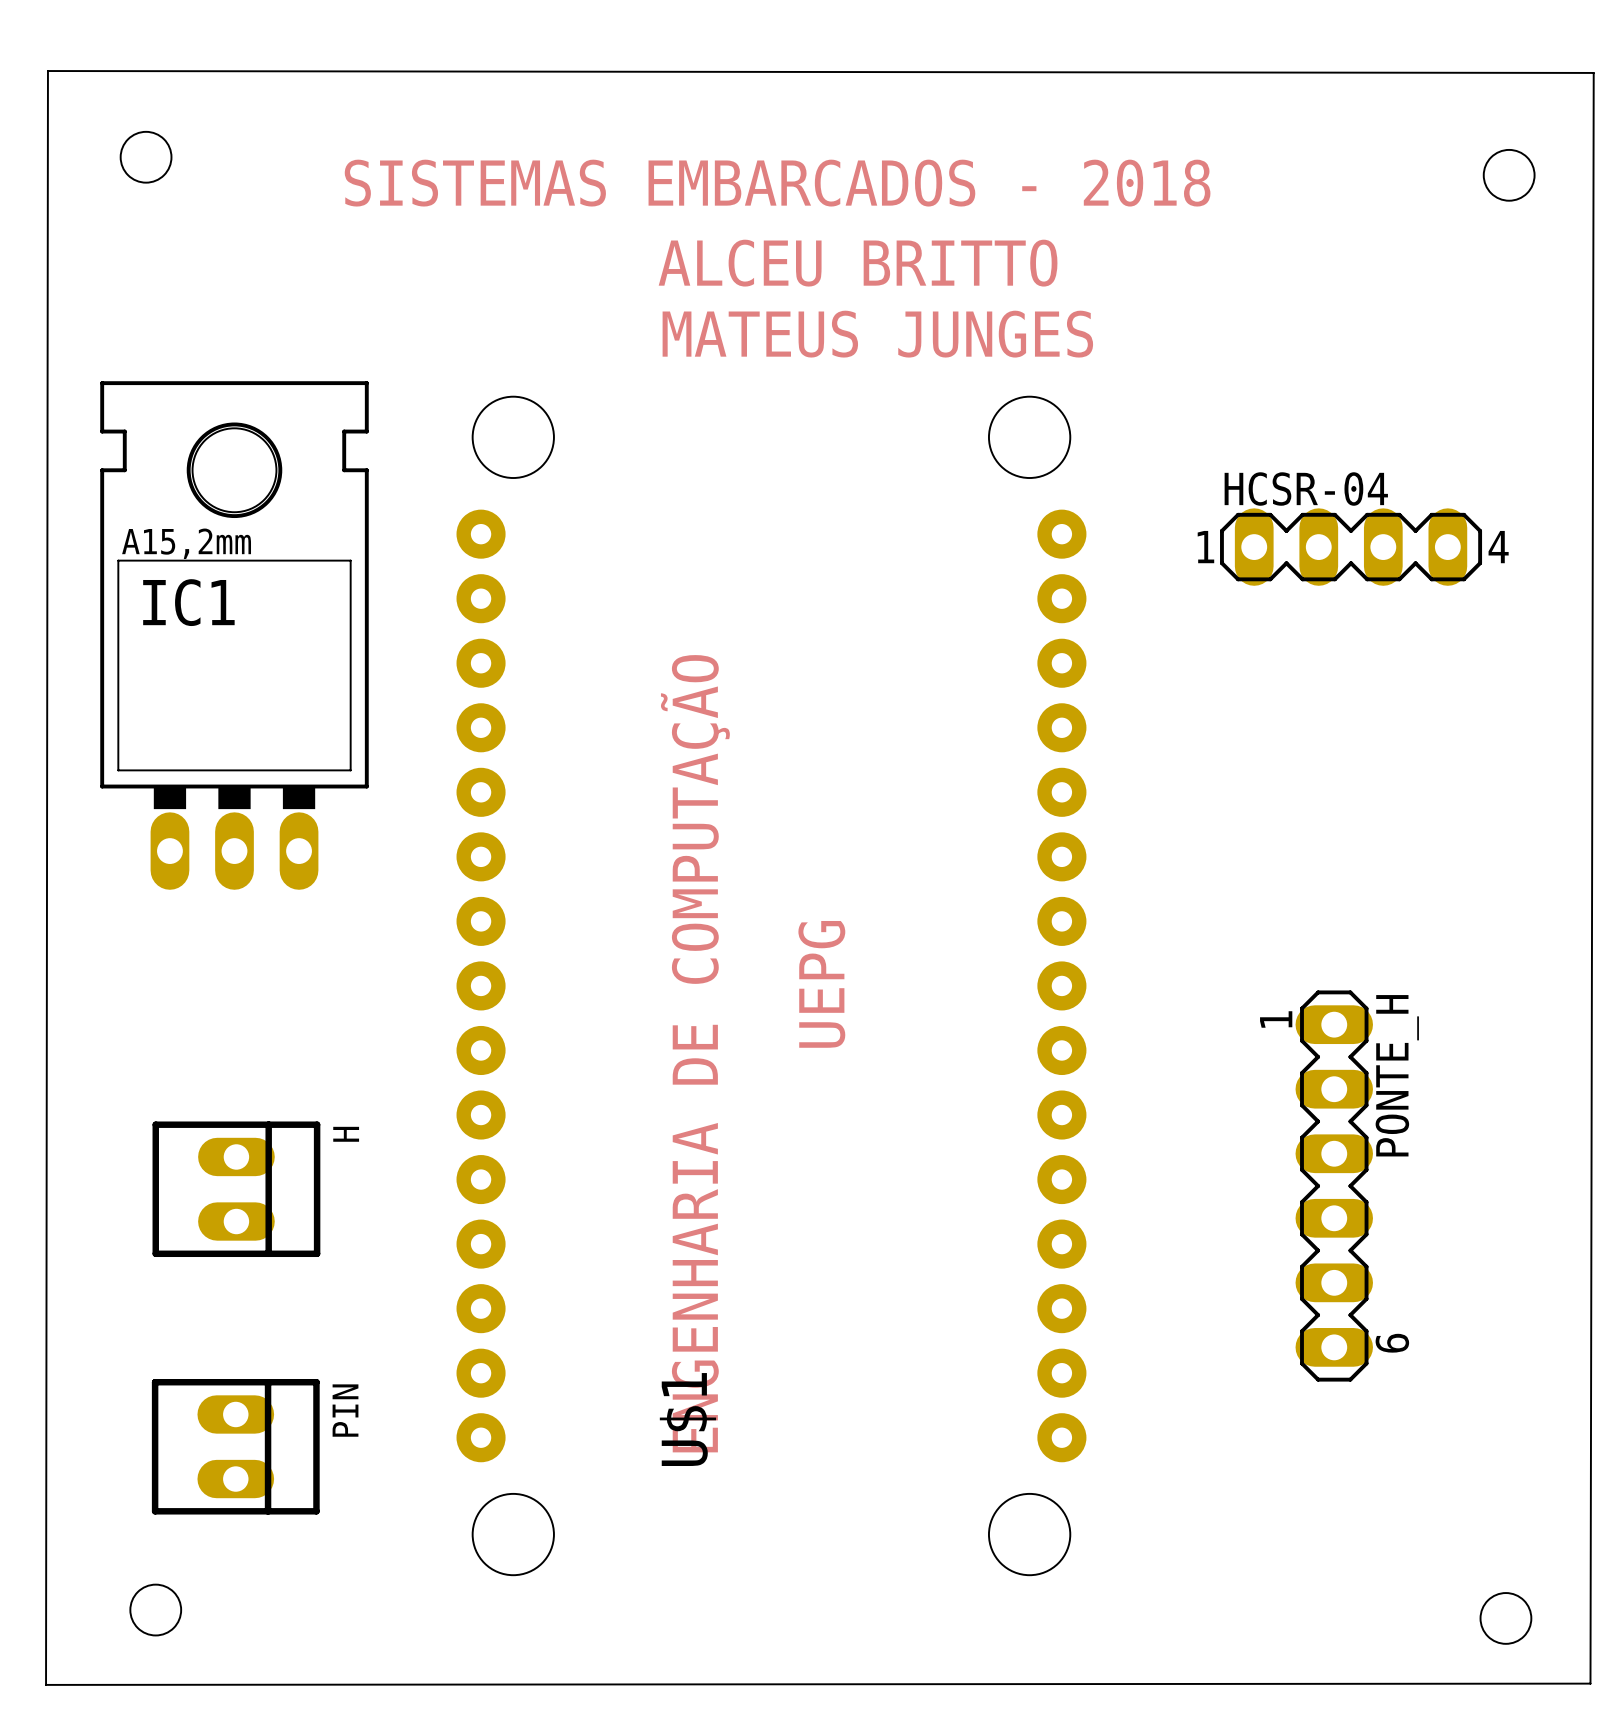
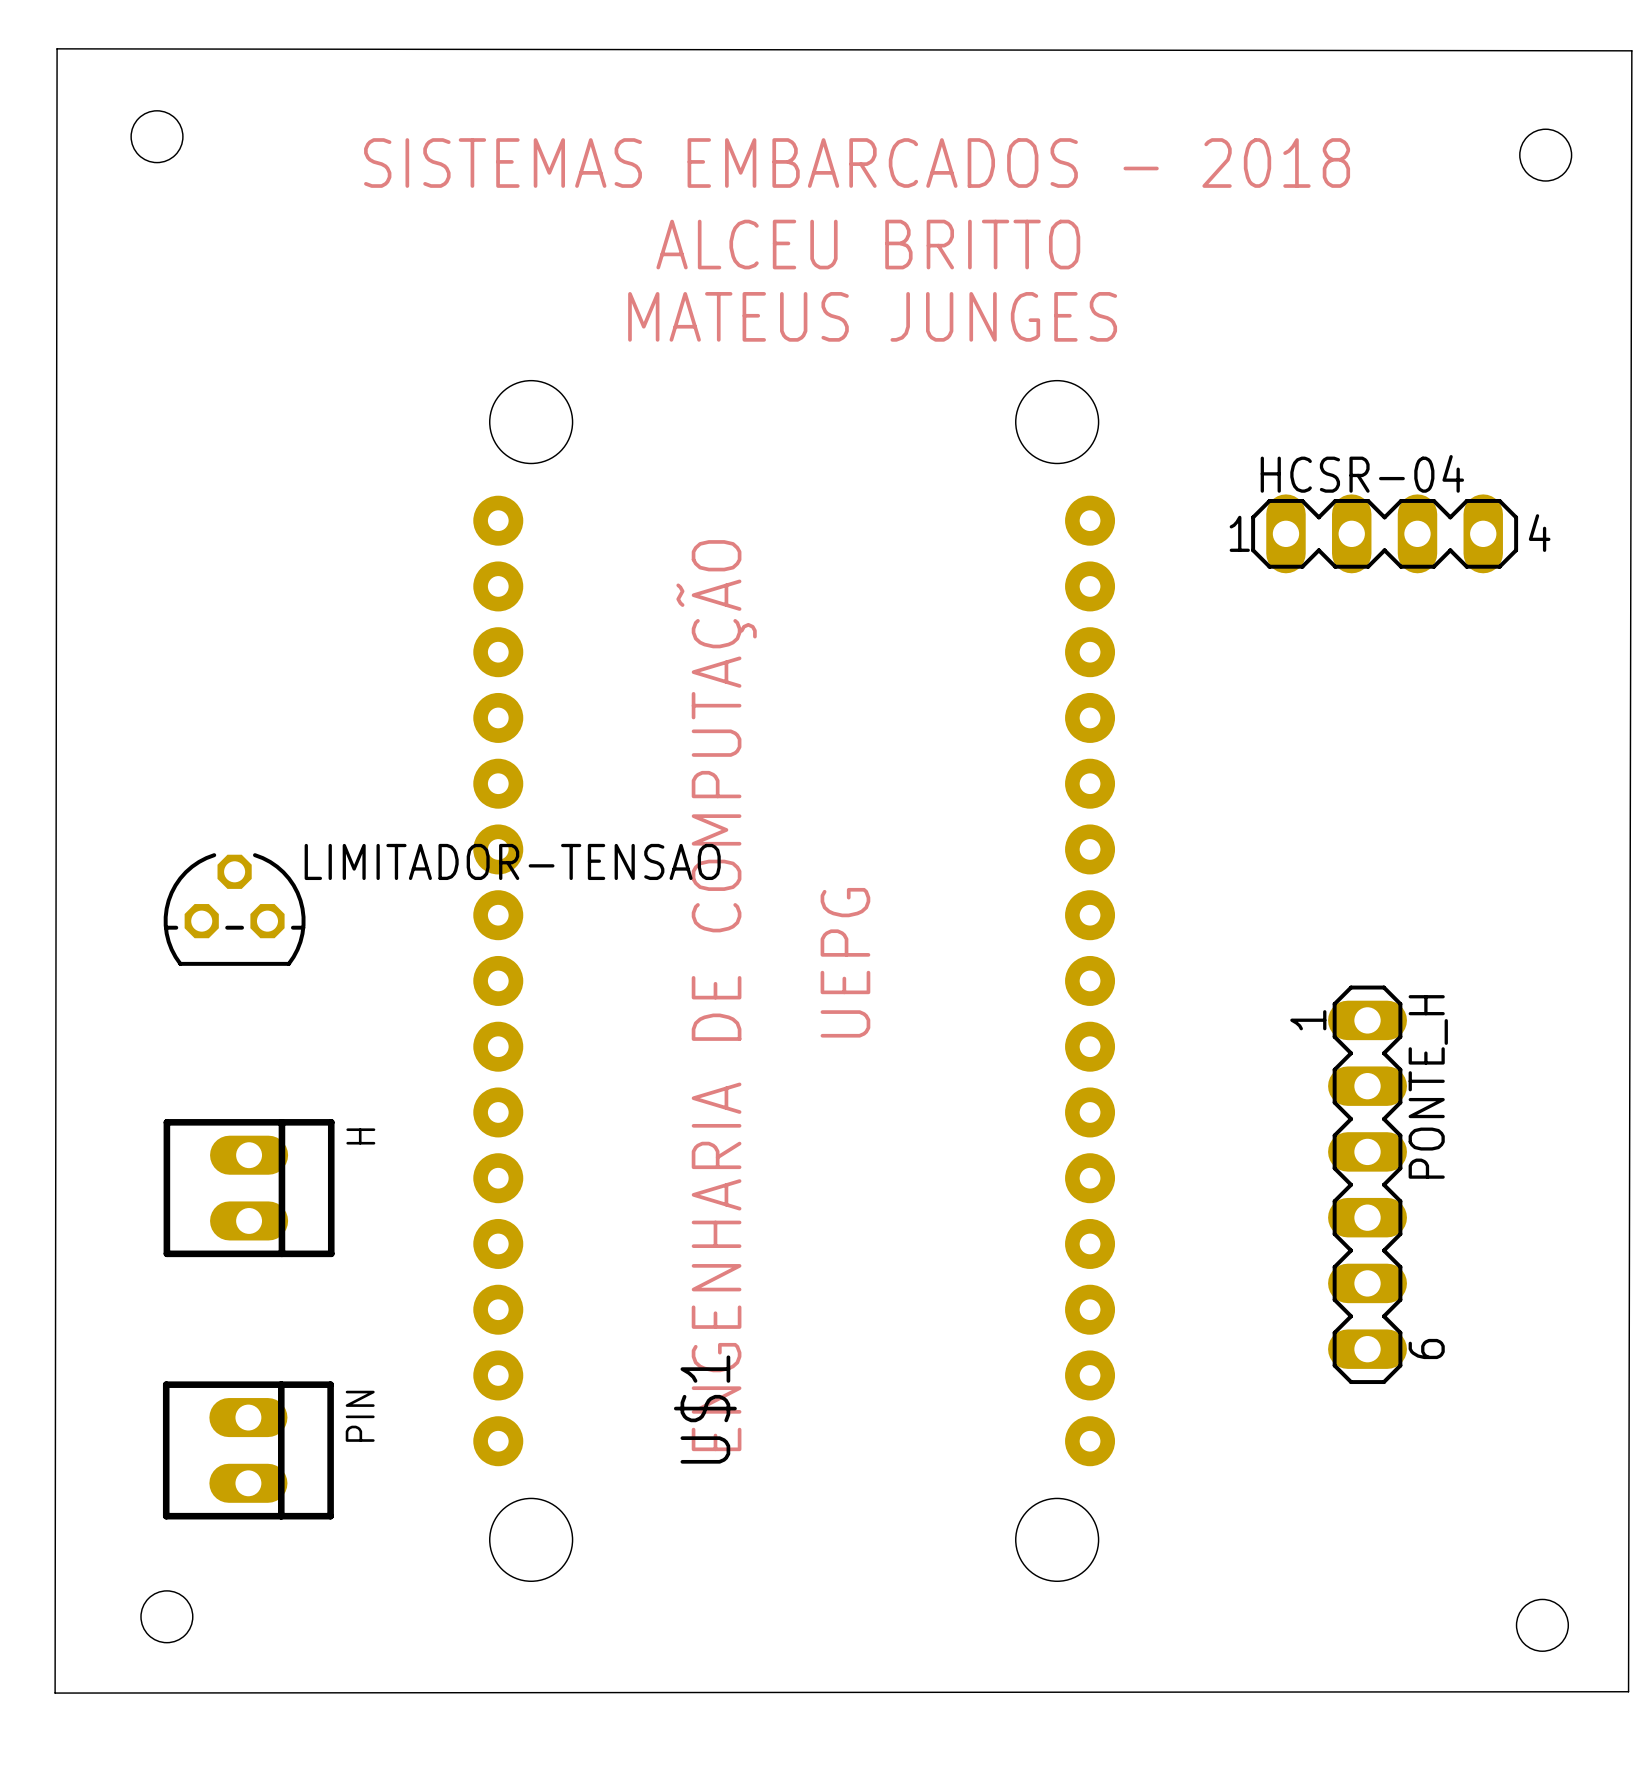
IC1: (234, 635) -> none
LIMITADOR-TENSAO: none -> (234, 909)

